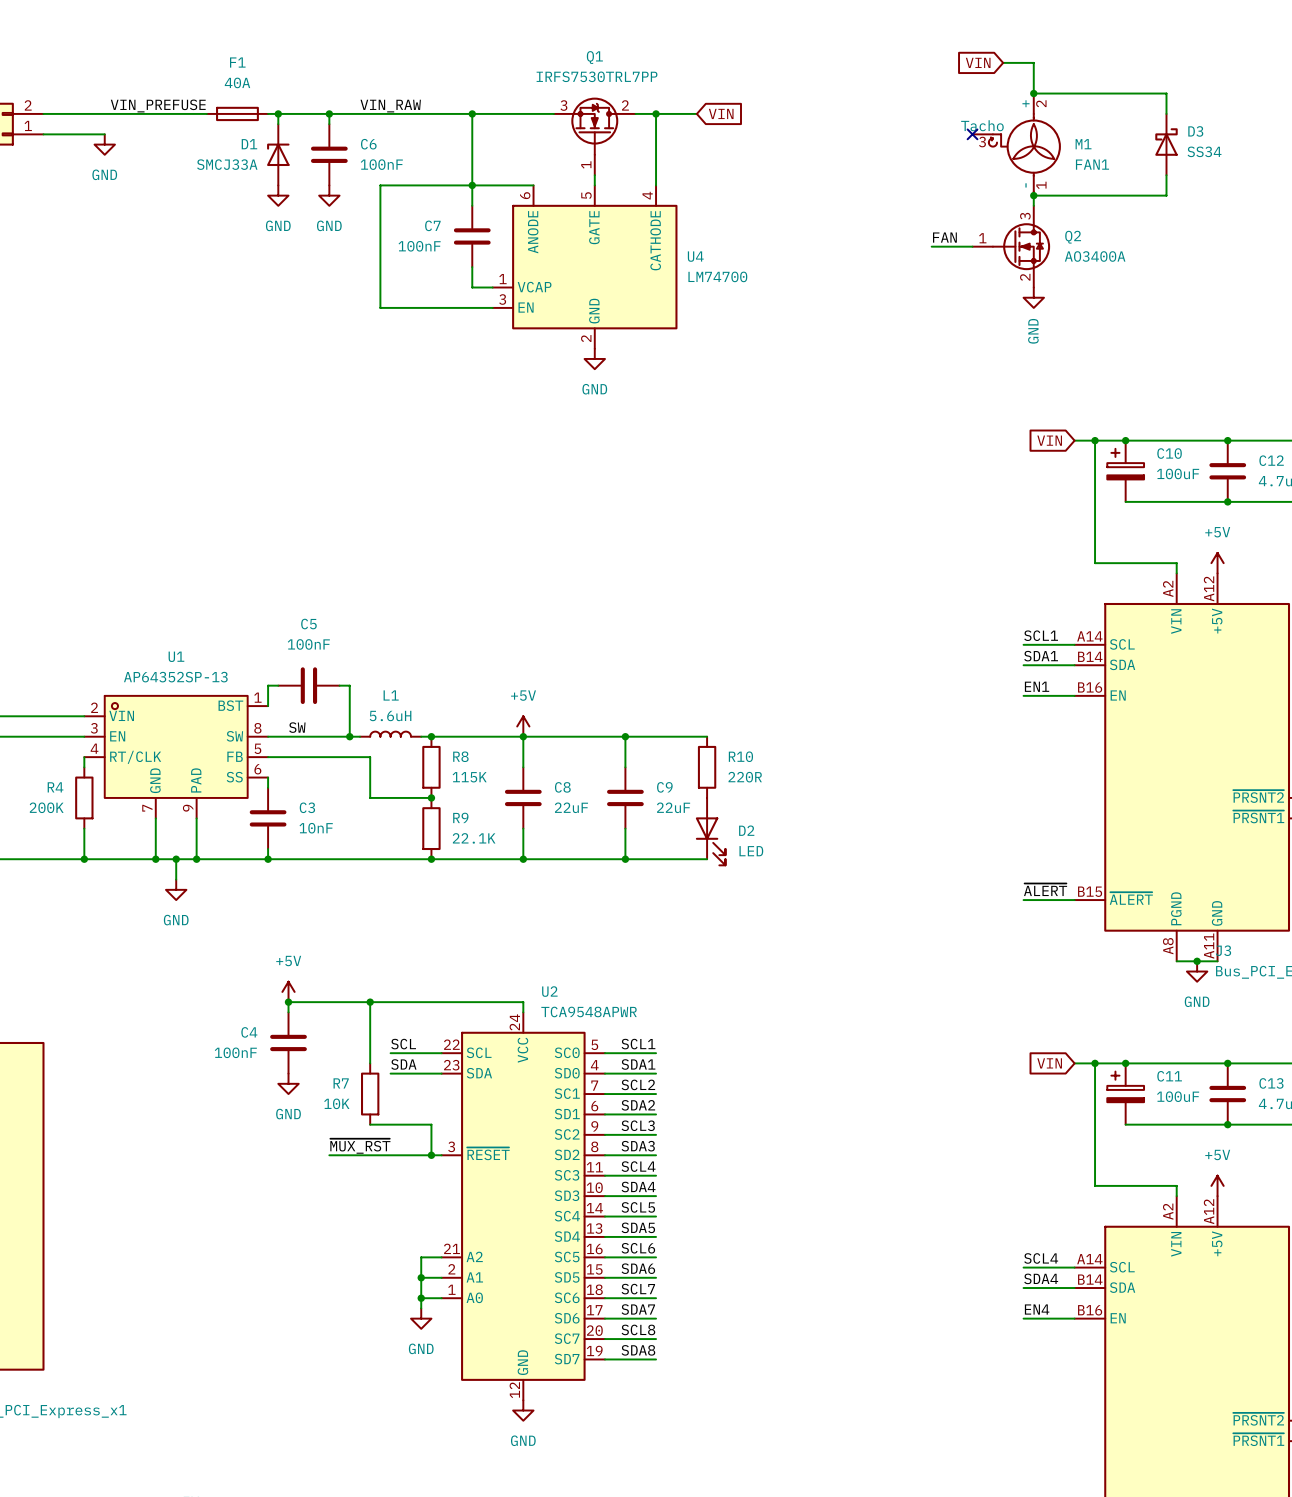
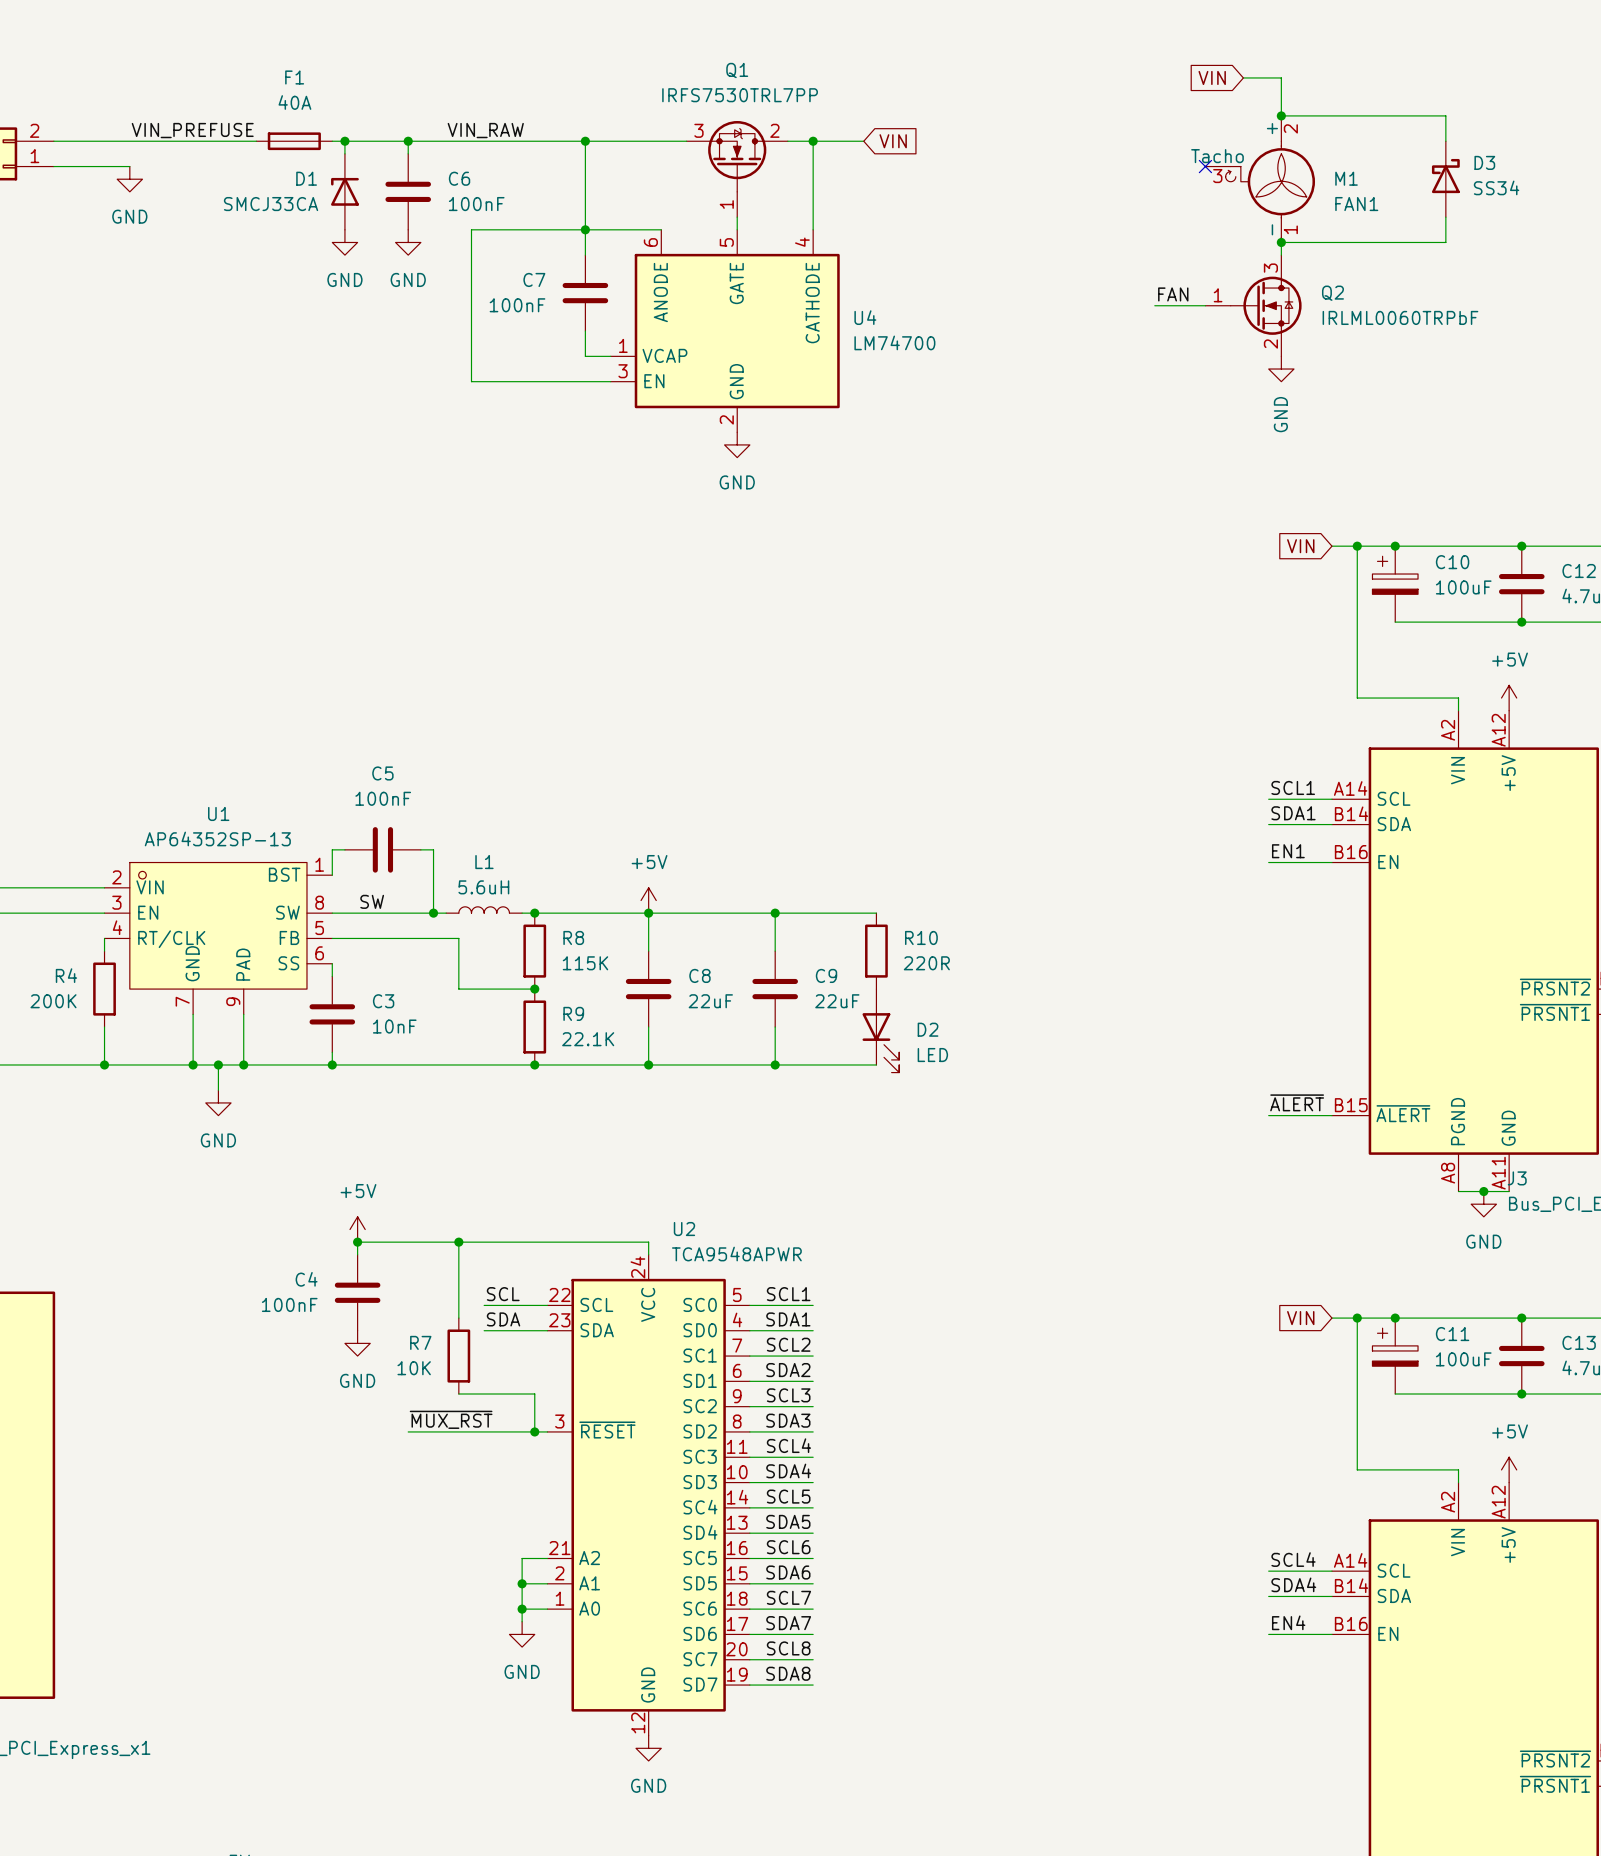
D1 value: SMCJ33A (227, 164) -> SMCJ33CA (271, 204)
Q2 value: AO3400A (1095, 256) -> IRLML0060TRPbF (1400, 317)

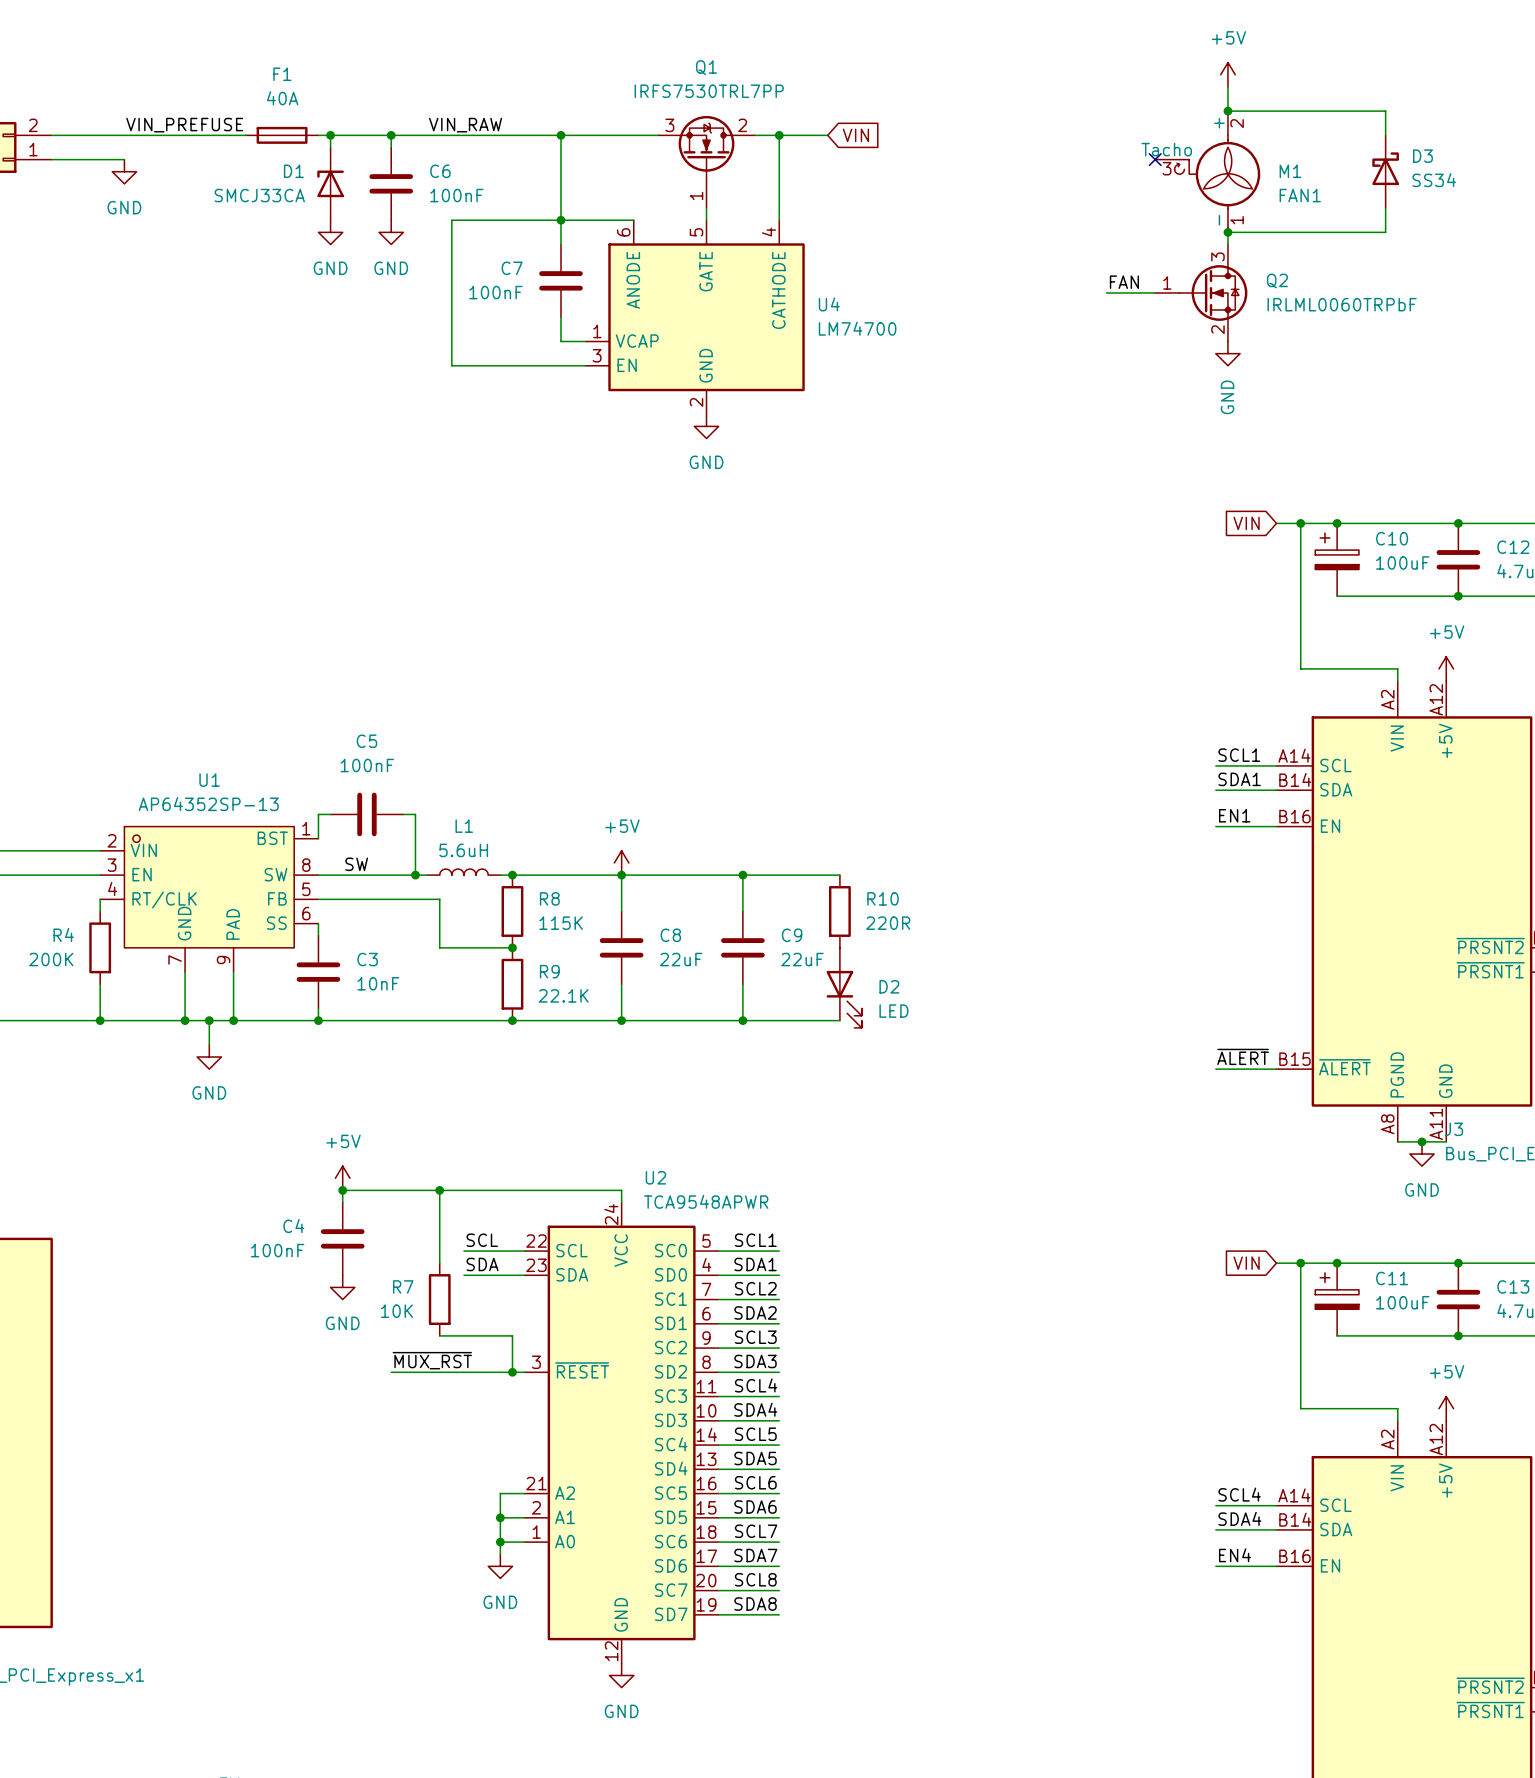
global label: VIN (1212, 77) -> none
wire: (1243, 77) (1281, 77) (1281, 90) -> none
power symbol: none -> +5V (1227, 74)

